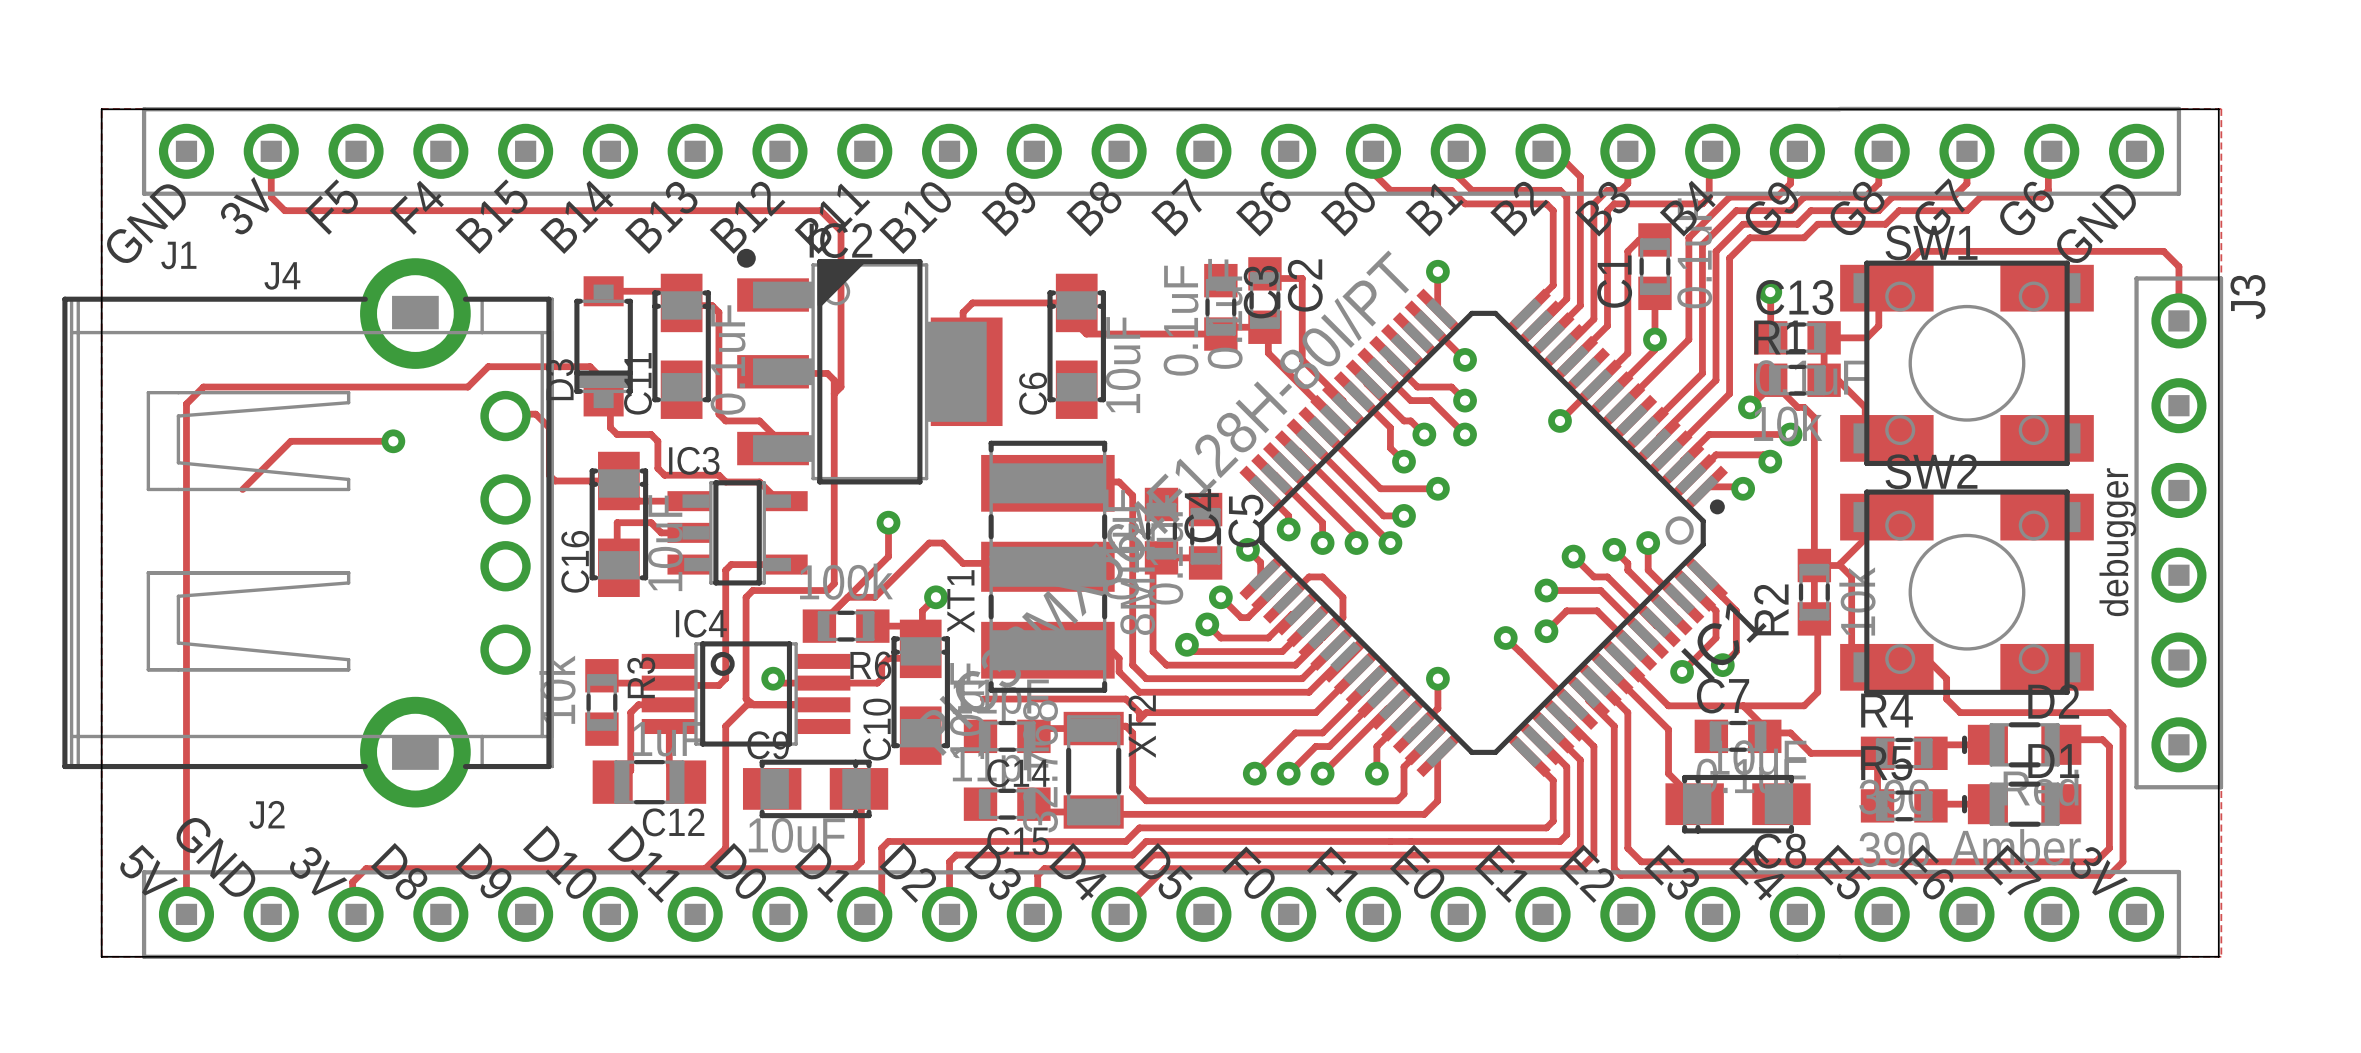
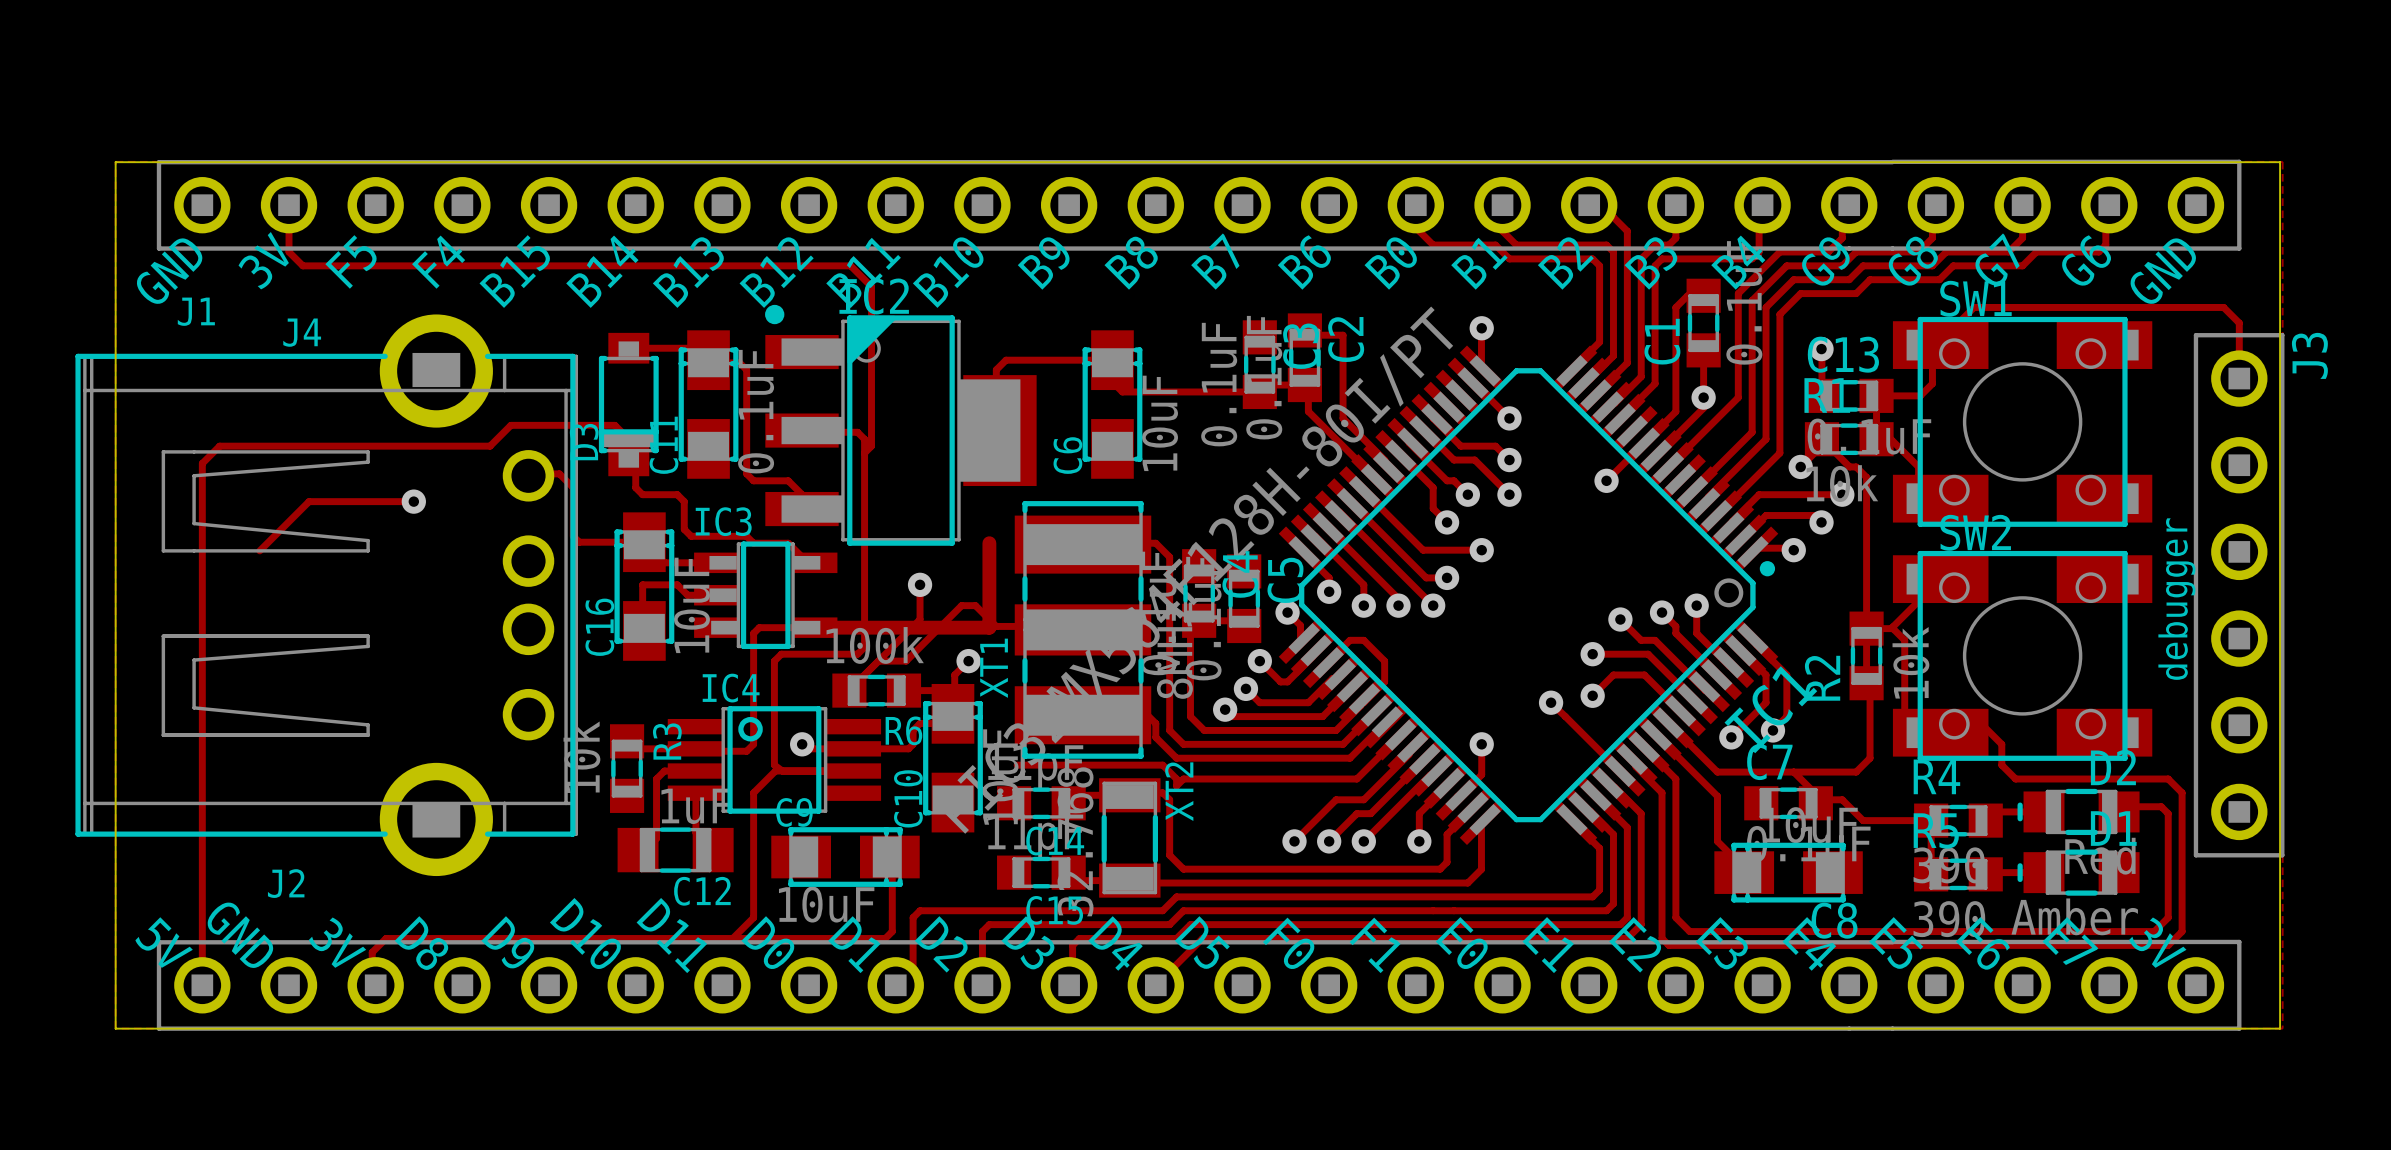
track: none -> (989, 543) (989, 627) (815, 627)

